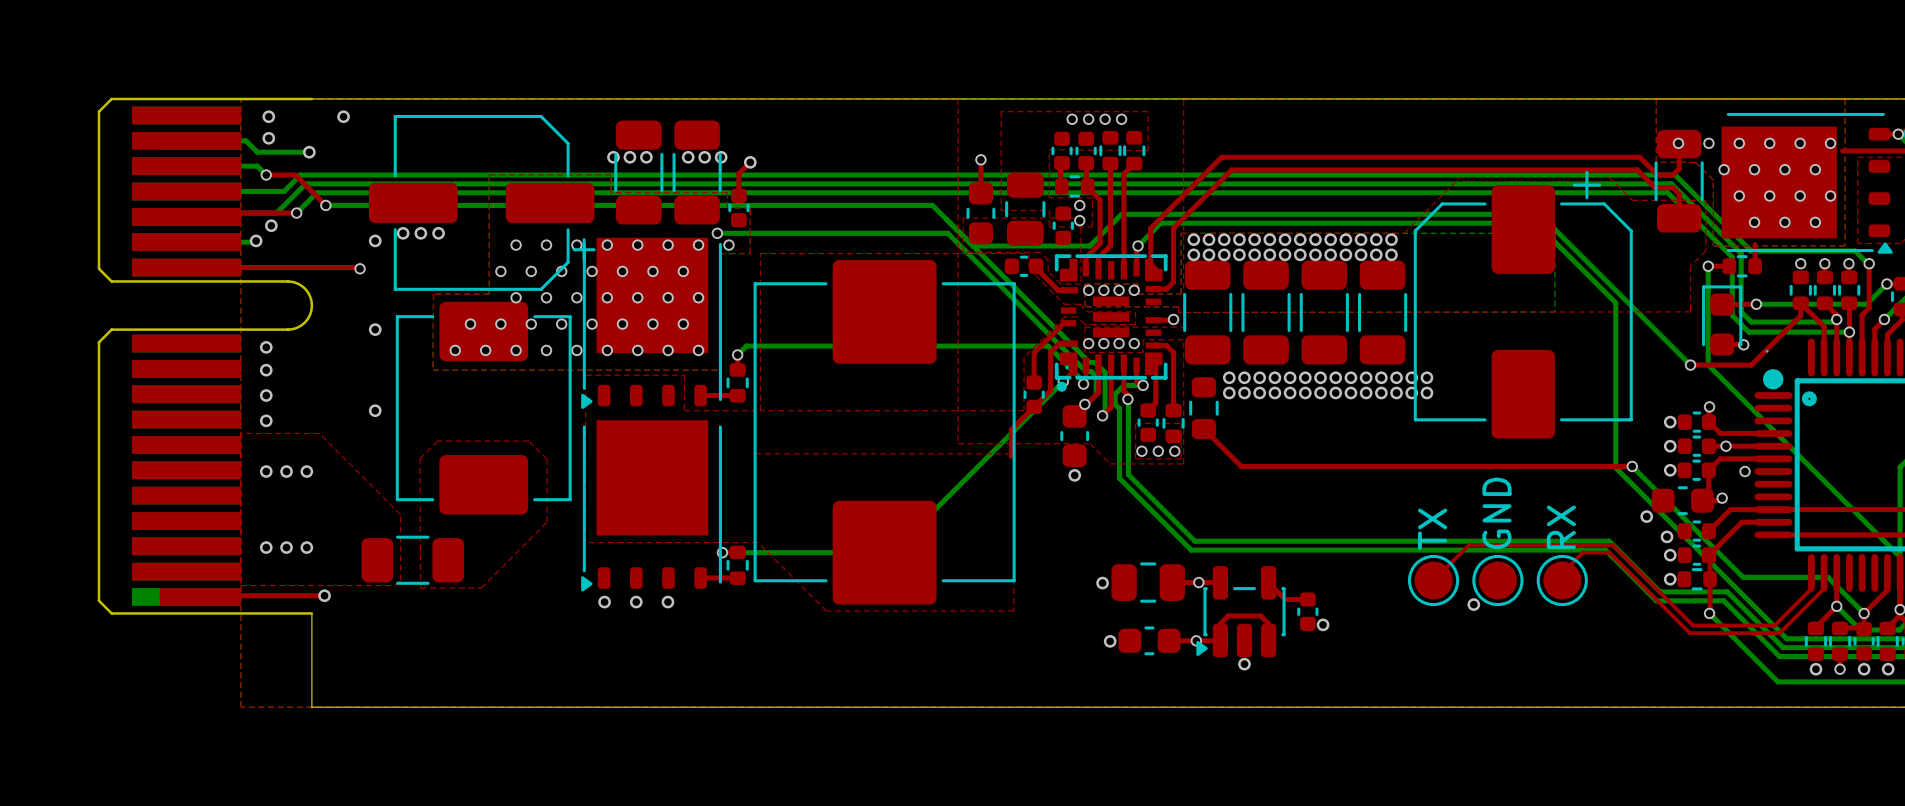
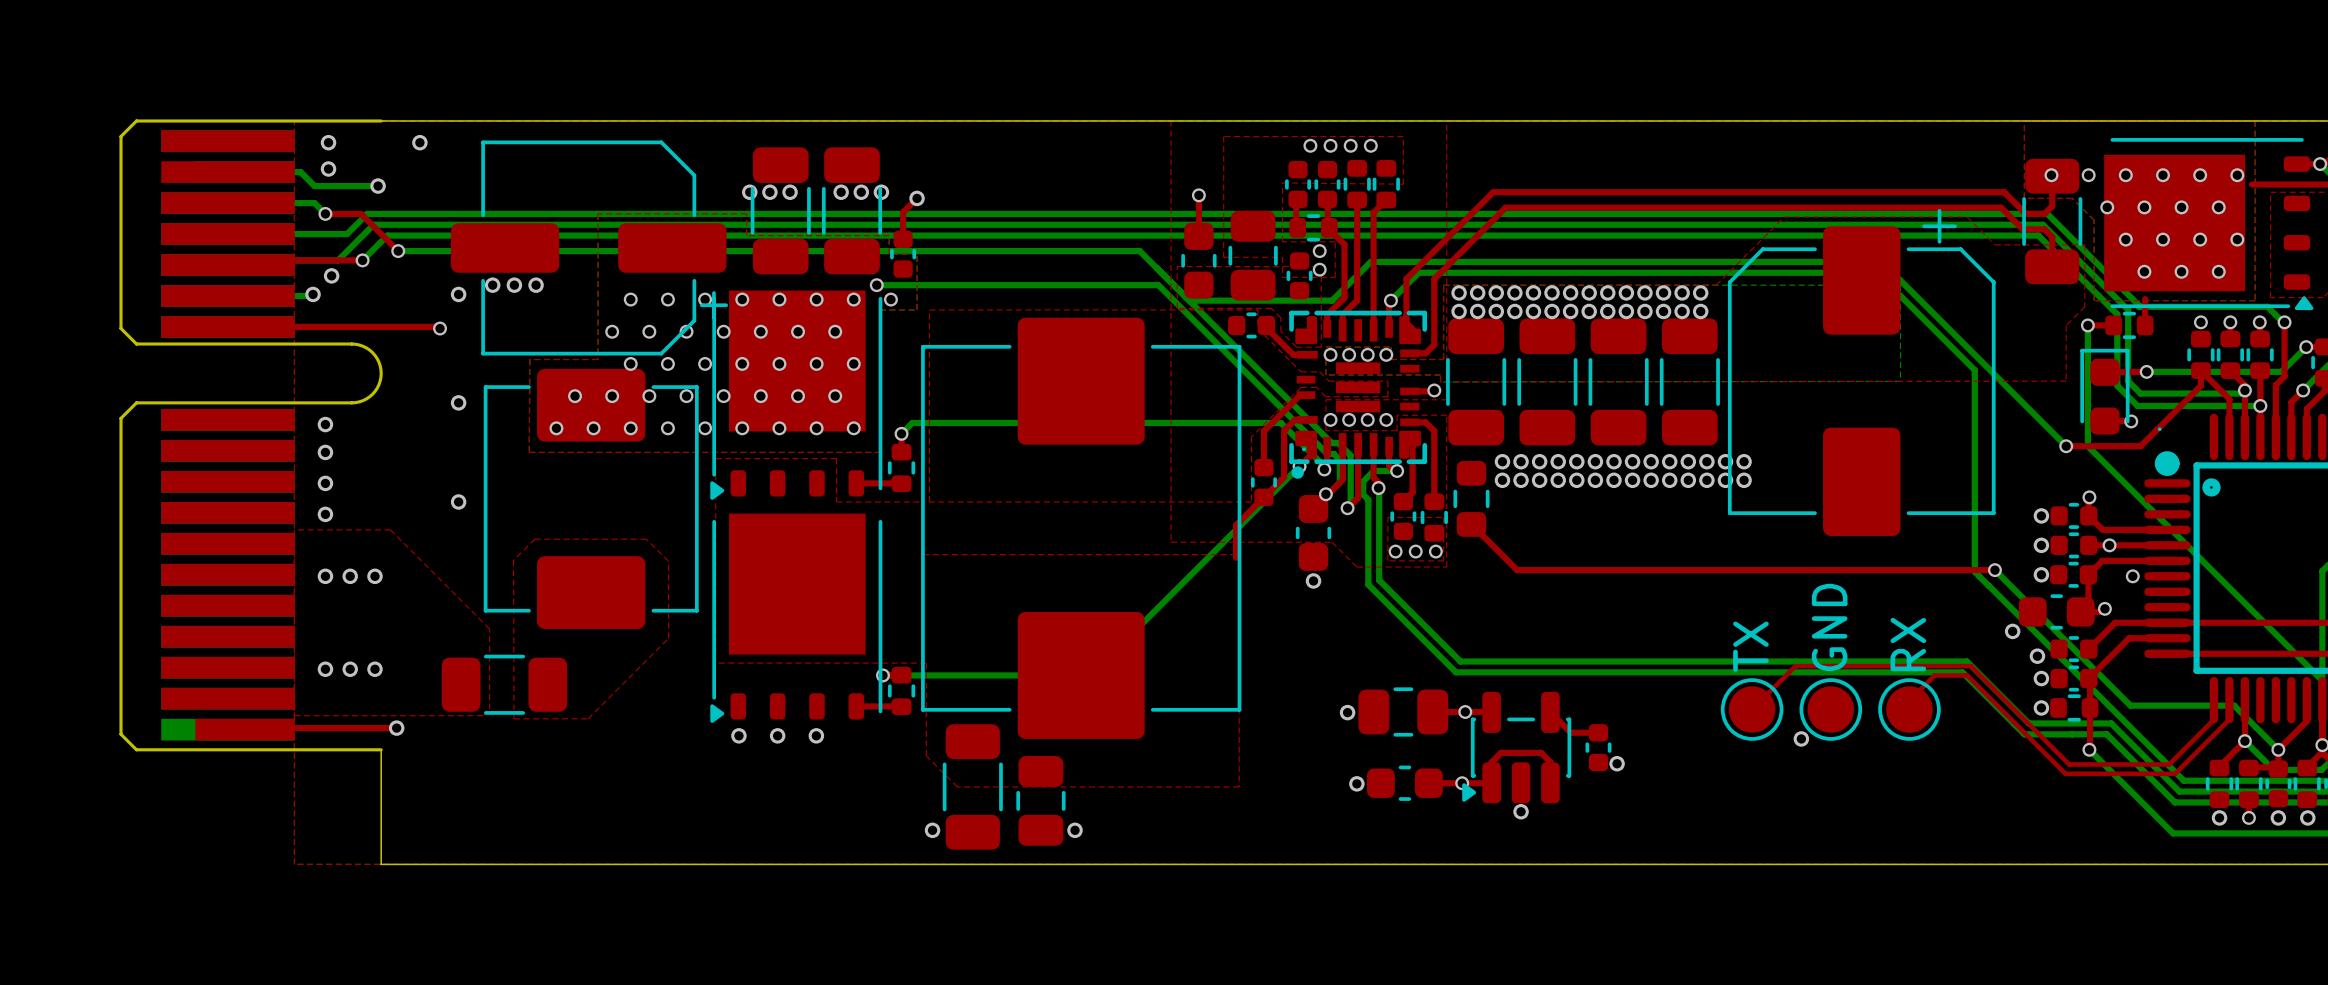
top zone outline: (757, 542) (826, 610) (1013, 610) -> (926, 663) (926, 755) (957, 786) (1239, 786) (1239, 746)
part: none -> (972, 786)
part: none -> (1040, 800)
via: none -> (932, 830)
via: none -> (1075, 830)

